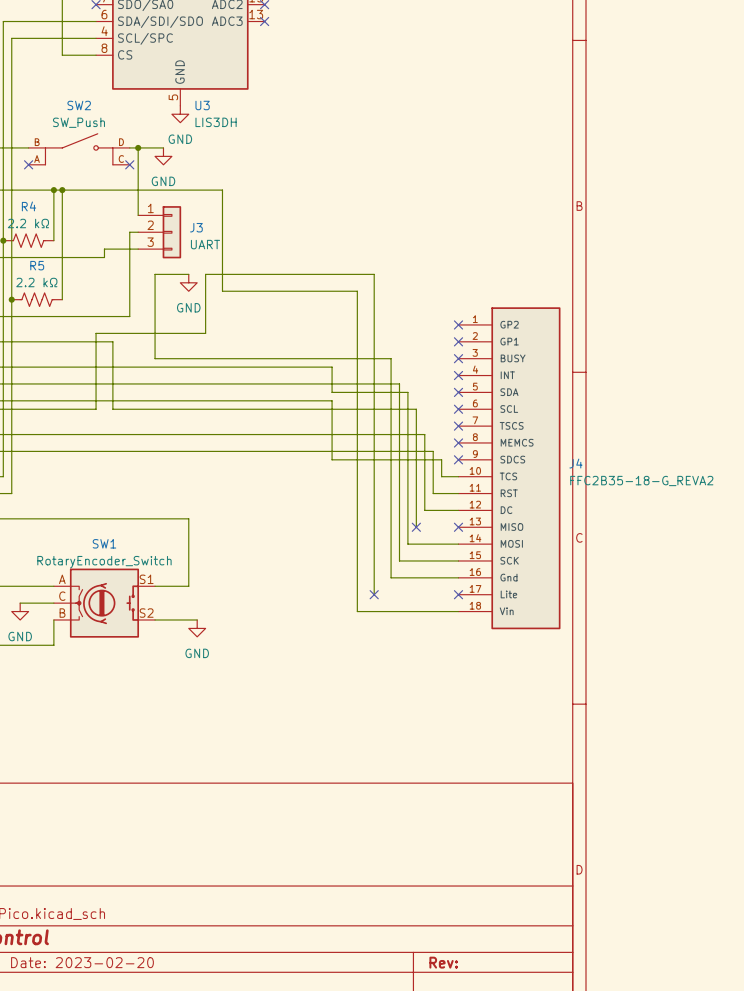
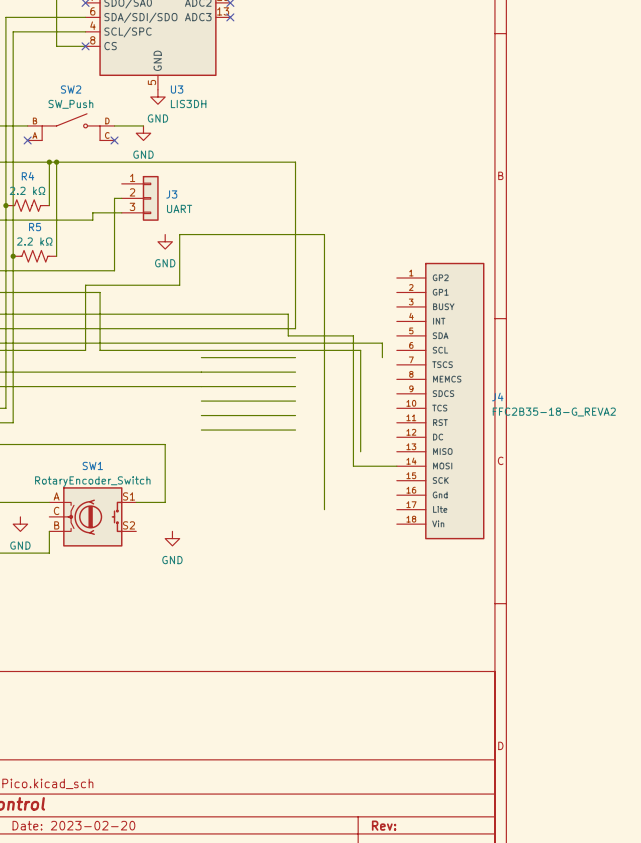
no-connect mark: none -> (85, 46)
wire: (138, 147) (138, 215) -> none
junction: (138, 147) -> none
wire: (222, 190) (222, 291) (357, 291) (357, 611) (458, 611) -> (194, 162) (295, 162) (295, 328)
wire: (188, 274) (155, 274) (155, 358) (391, 358) (391, 577) (458, 577) -> none
no-connect mark: (458, 324) -> none
no-connect mark: (458, 341) -> none
no-connect mark: (458, 358) -> none
no-connect mark: (458, 375) -> none
wire: (340, 383) (399, 383) (399, 560) (458, 560) -> none
no-connect mark: (458, 392) -> none
wire: (332, 400) (332, 459) (441, 459) (441, 476) (458, 476) -> (288, 343) (382, 343) (382, 357)
no-connect mark: (458, 409) -> none
wire: none -> (201, 357) (295, 357)
no-connect mark: (458, 426) -> none
wire: (340, 434) (424, 434) (424, 510) (458, 510) -> none
no-connect mark: (458, 442) -> none
wire: (340, 451) (433, 451) (433, 493) (458, 493) -> none
no-connect mark: (458, 459) -> none
wire: none -> (201, 401) (295, 401)
wire: none -> (201, 415) (295, 415)
wire: none -> (201, 430) (295, 430)
no-connect mark: (416, 527) -> none
no-connect mark: (458, 527) -> none
no-connect mark: (374, 594) -> none
no-connect mark: (458, 594) -> none
wire: (20, 603) (53, 603) -> none
wire: (155, 619) (197, 619) -> none

